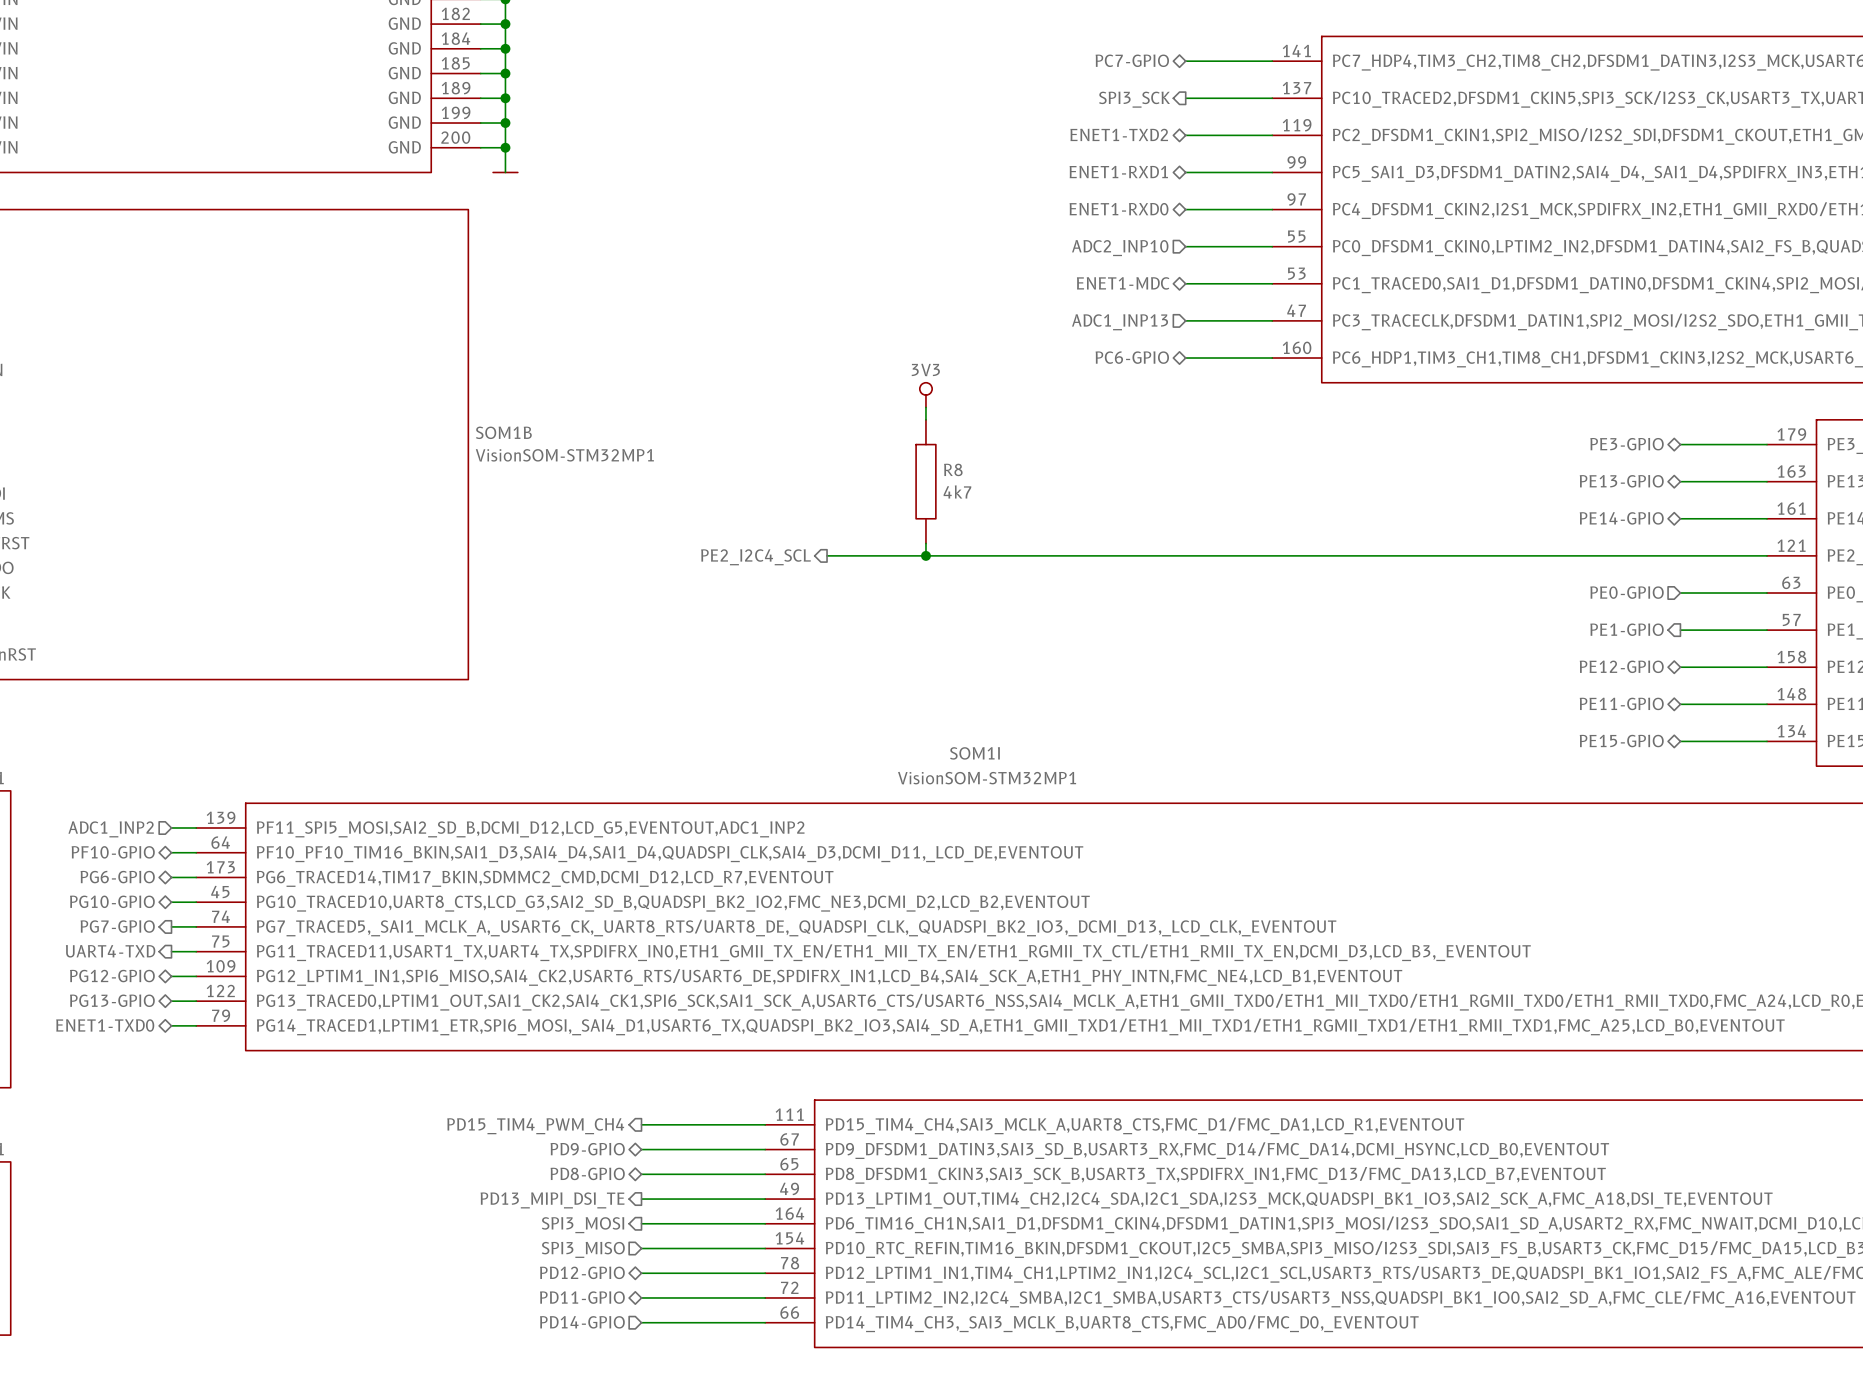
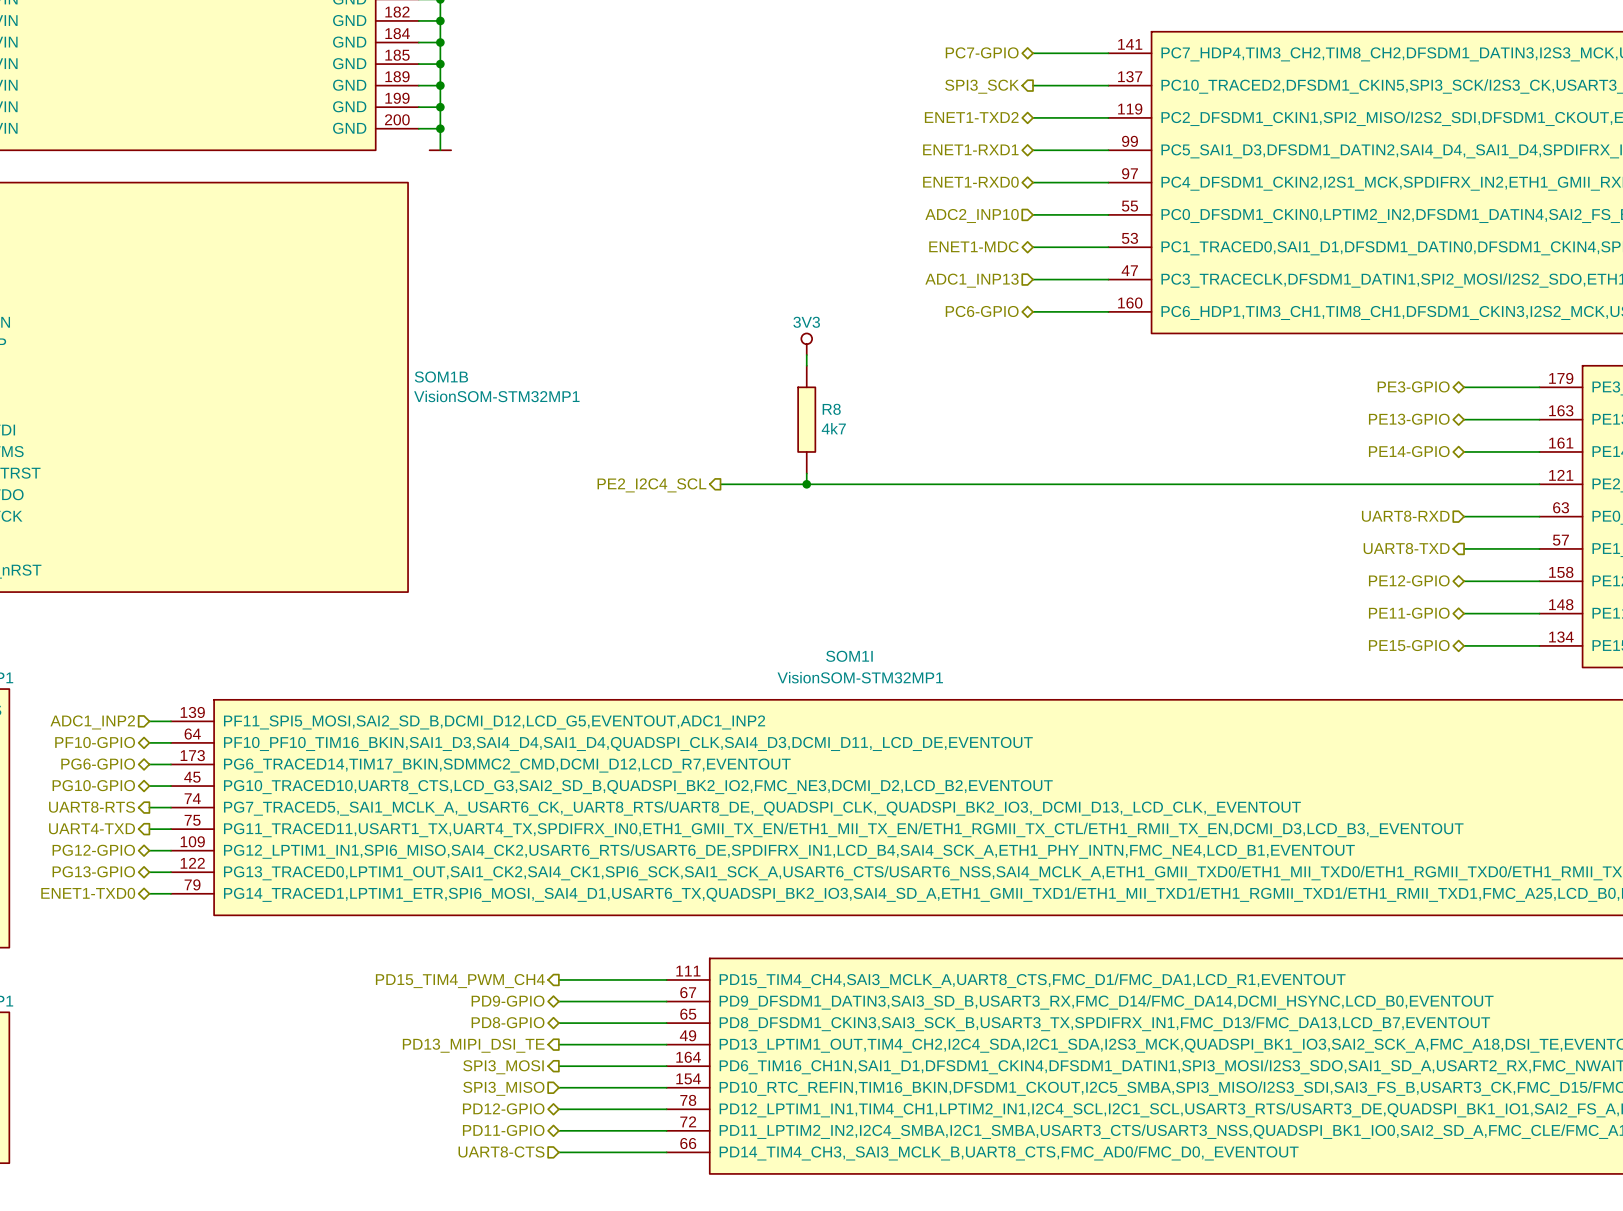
hierarchical label: PE0-GPIO (1627, 592) -> UART8-RXD (1405, 516)
hierarchical label: PE1-GPIO (1627, 629) -> UART8-TXD (1406, 548)
hierarchical label: PG7-GPIO (117, 926) -> UART8-RTS (92, 807)
hierarchical label: PD14-GPIO (582, 1322) -> UART8-CTS (501, 1151)

